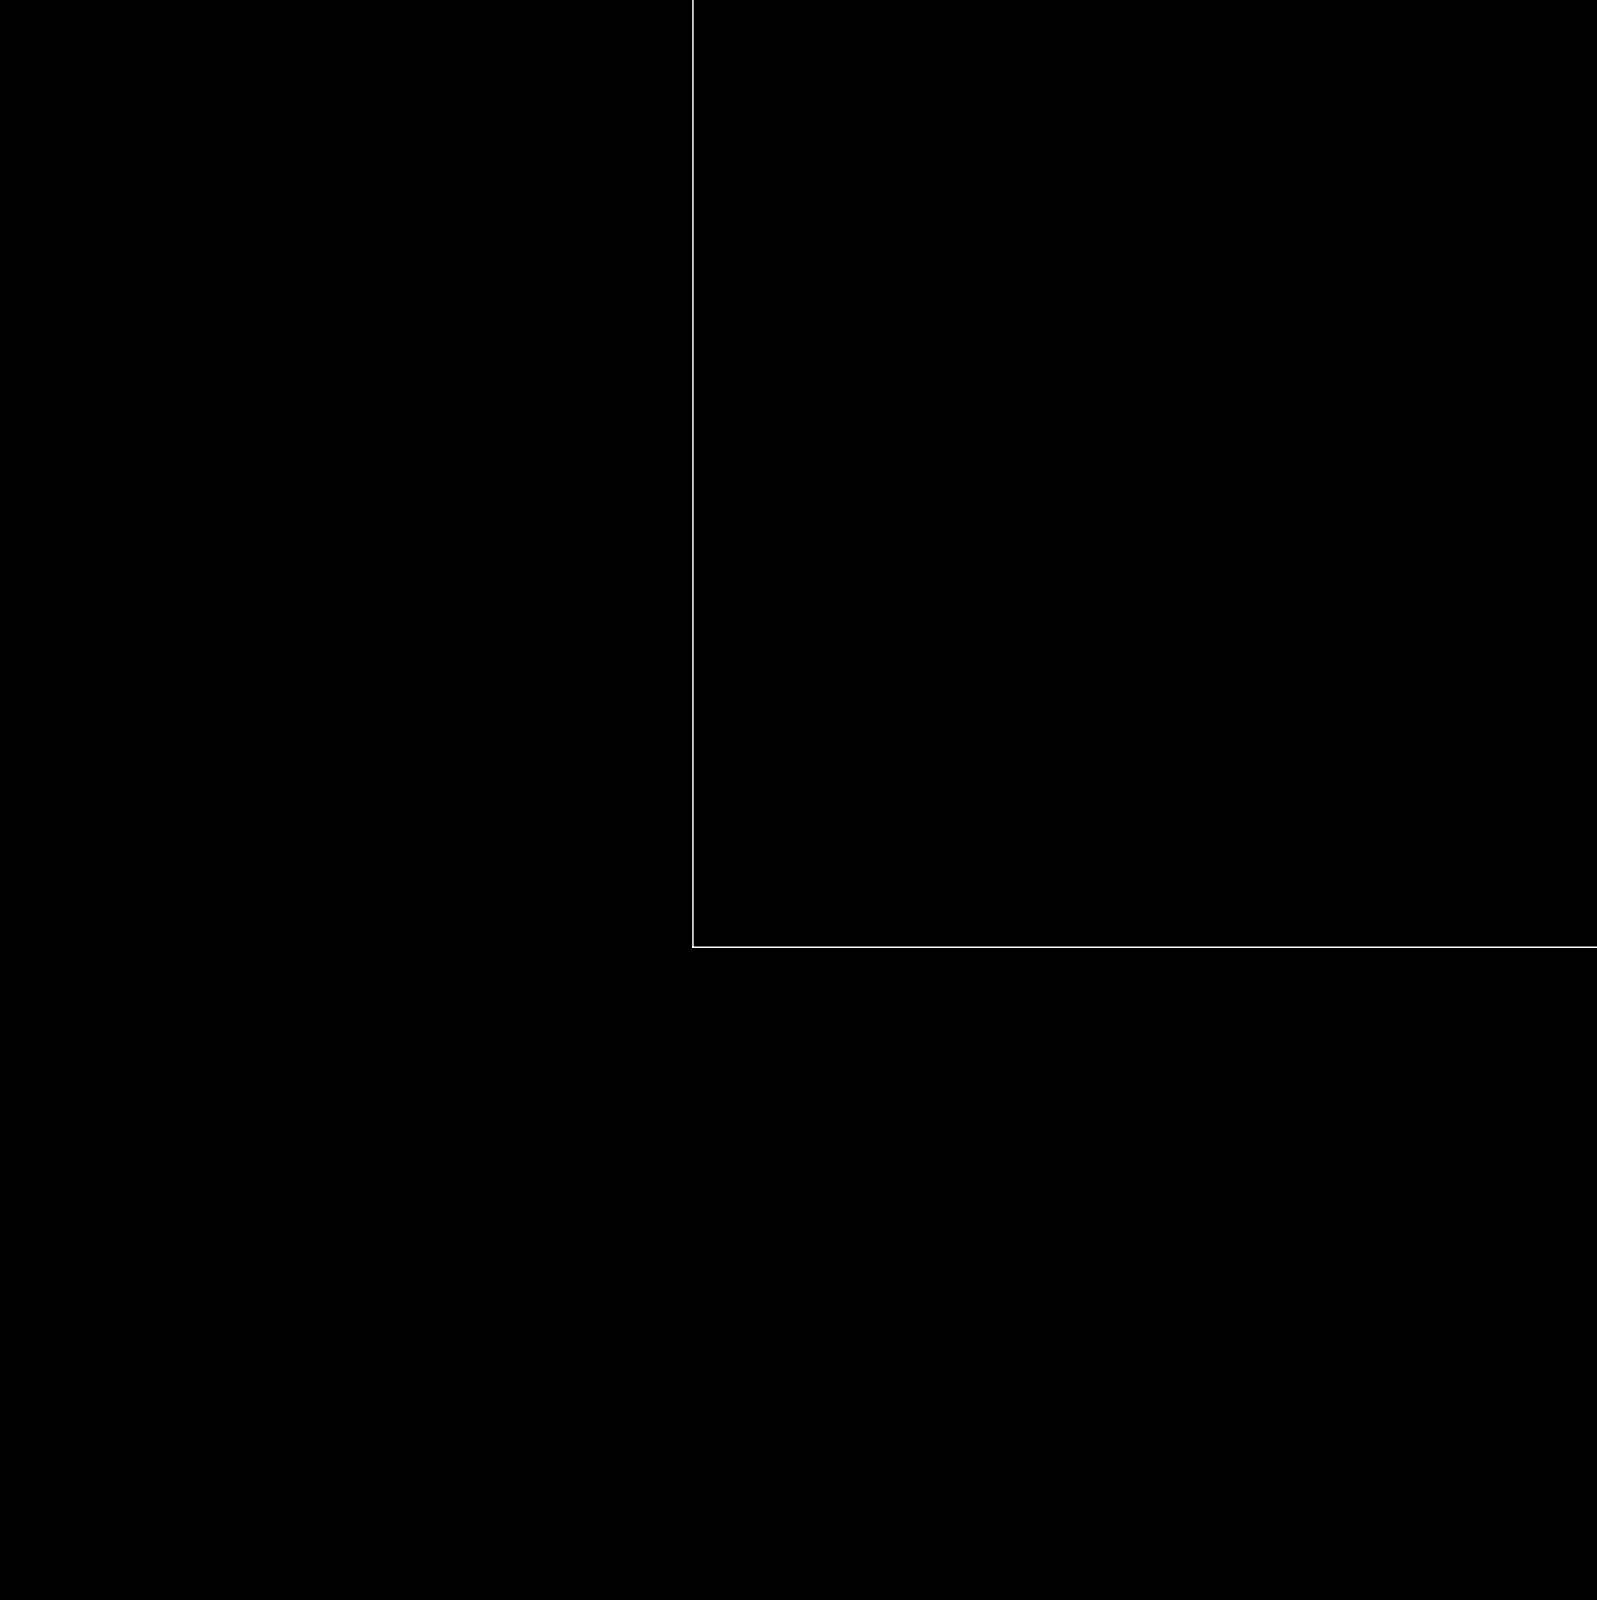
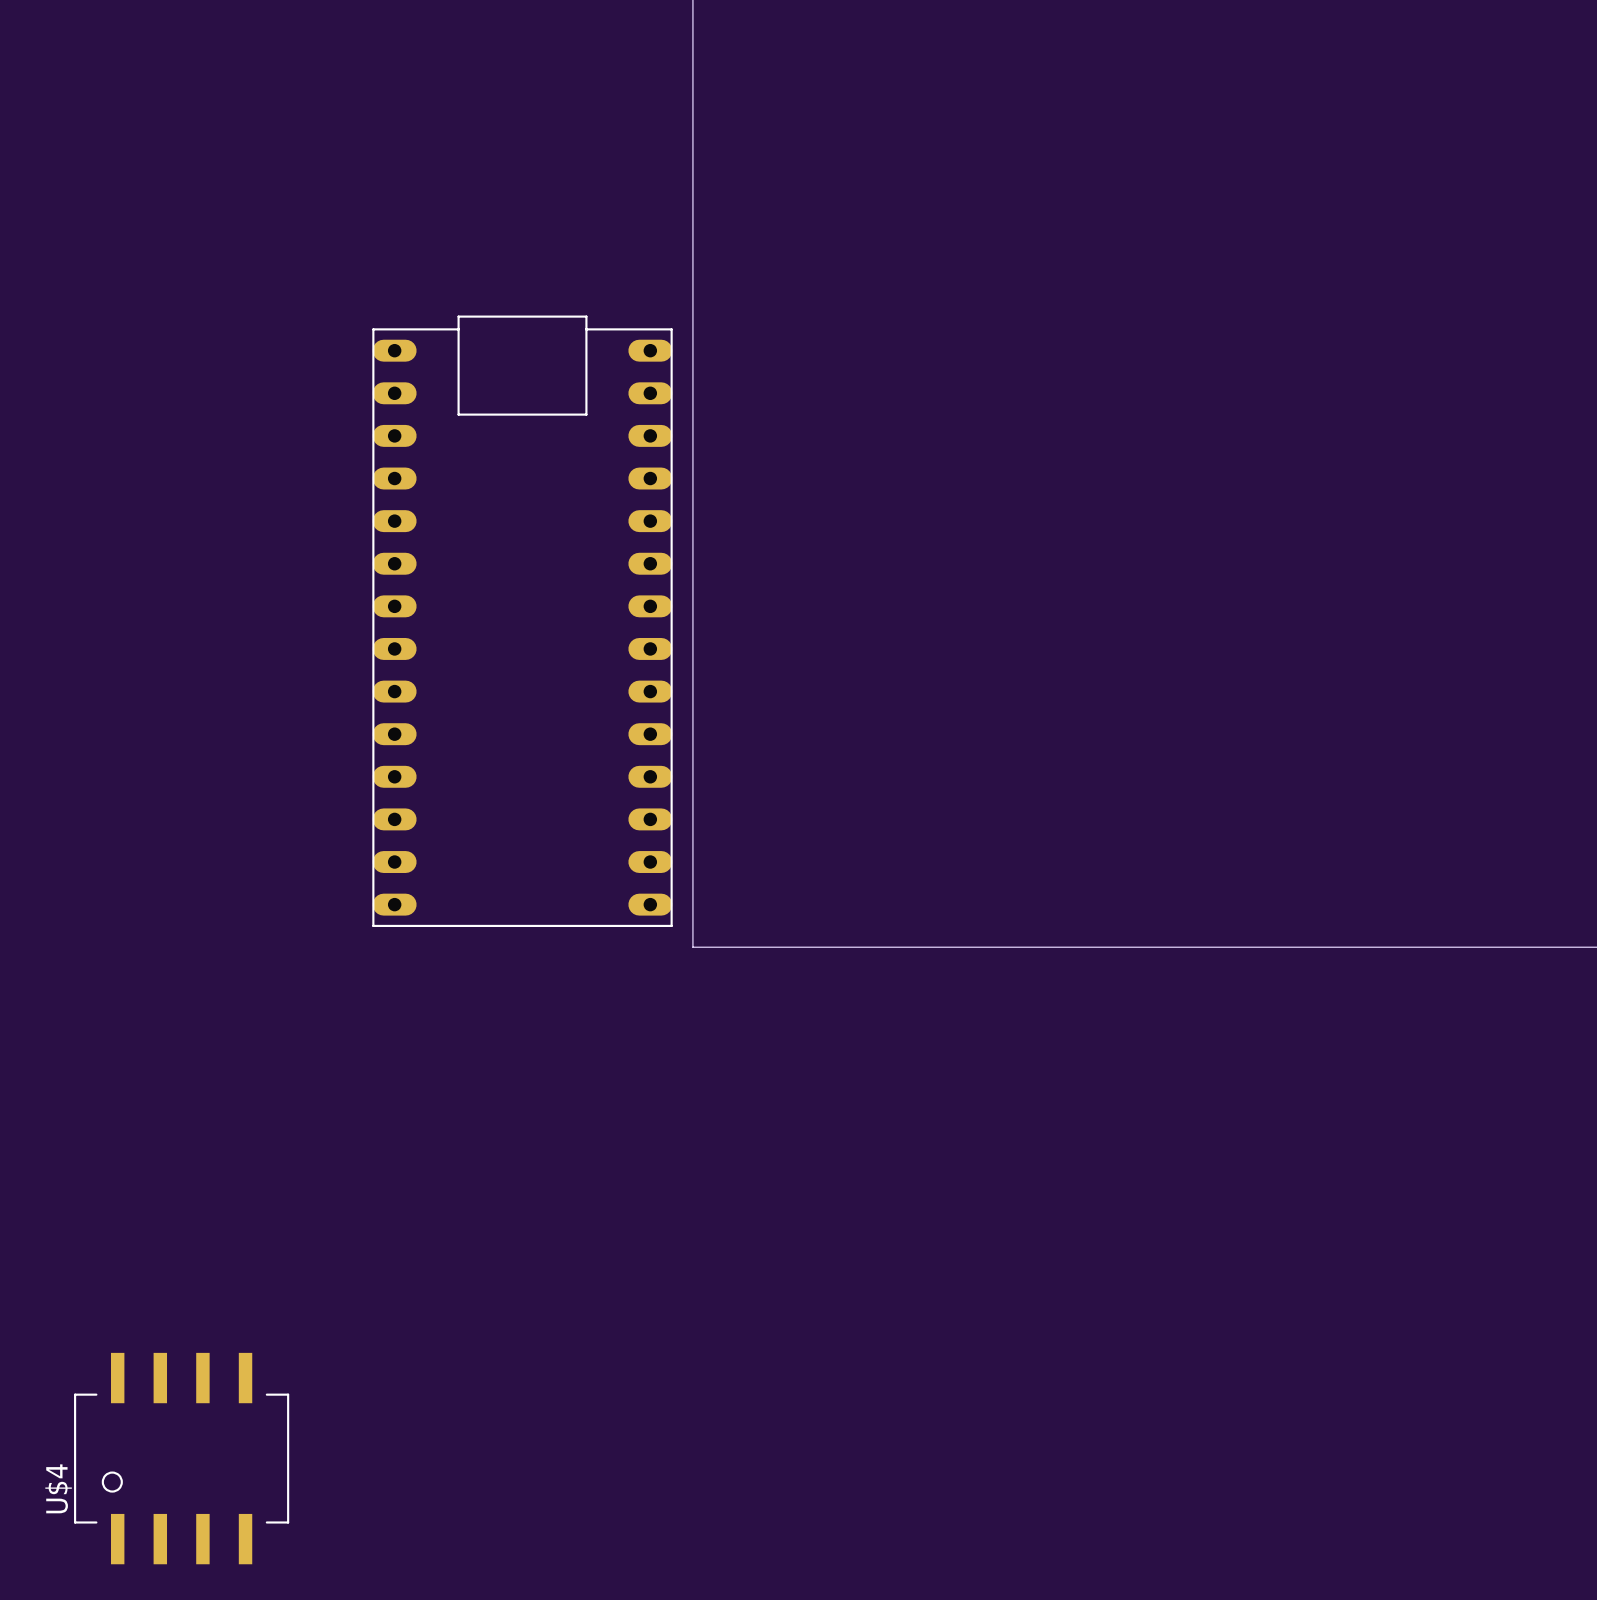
part: none -> (522, 621)
U$4: none -> (181, 1458)

